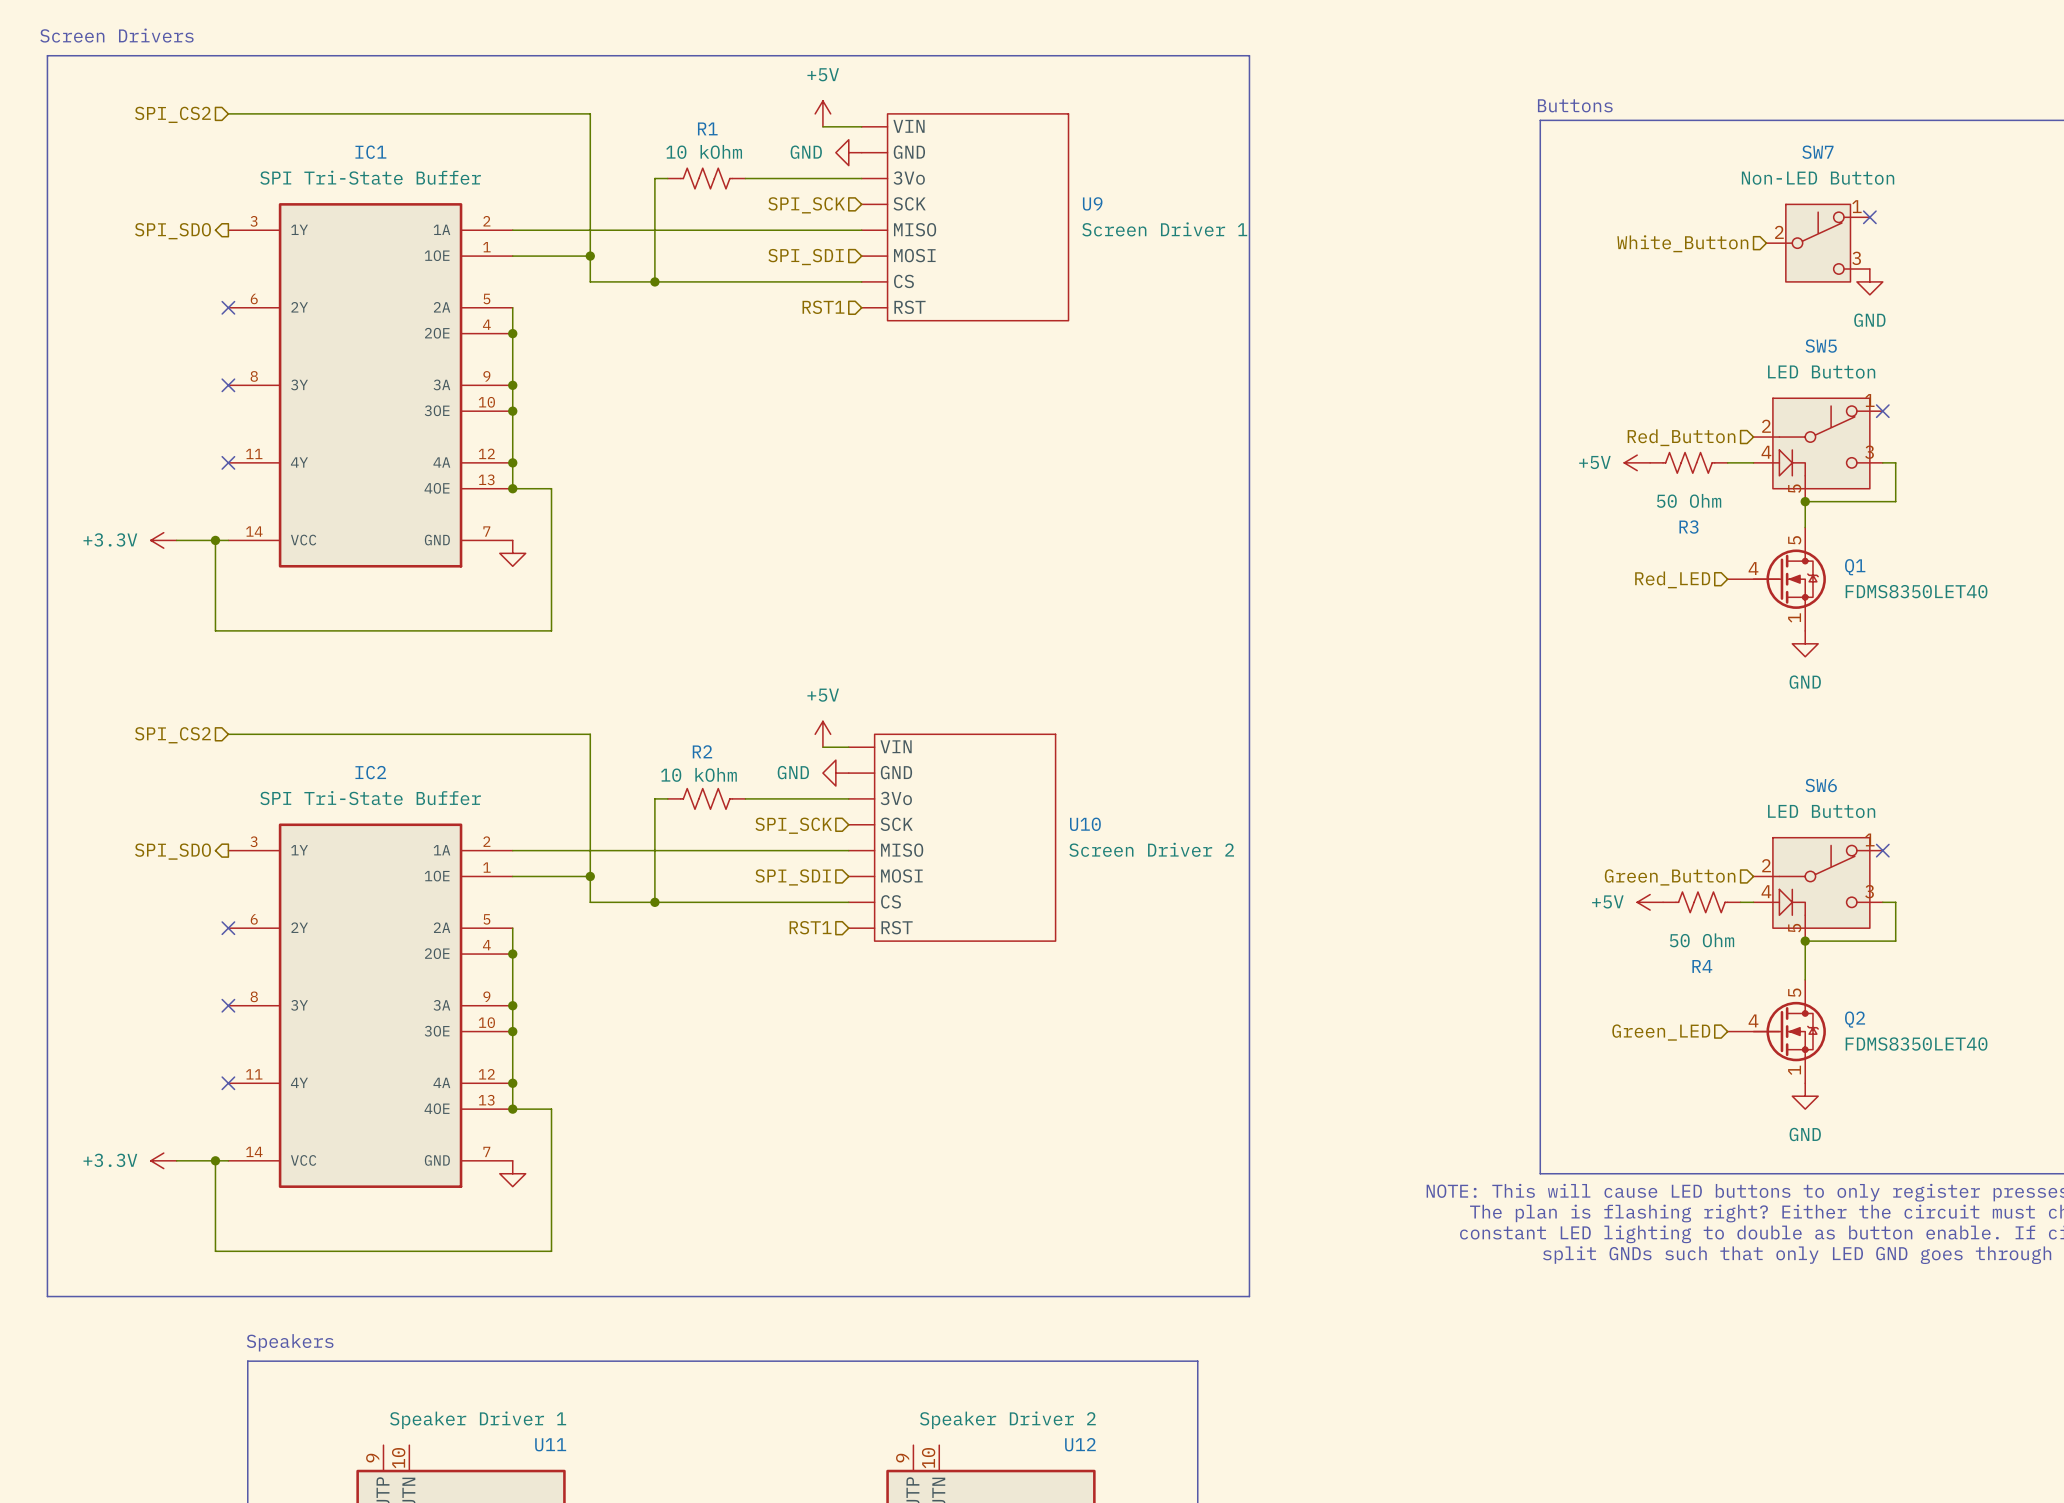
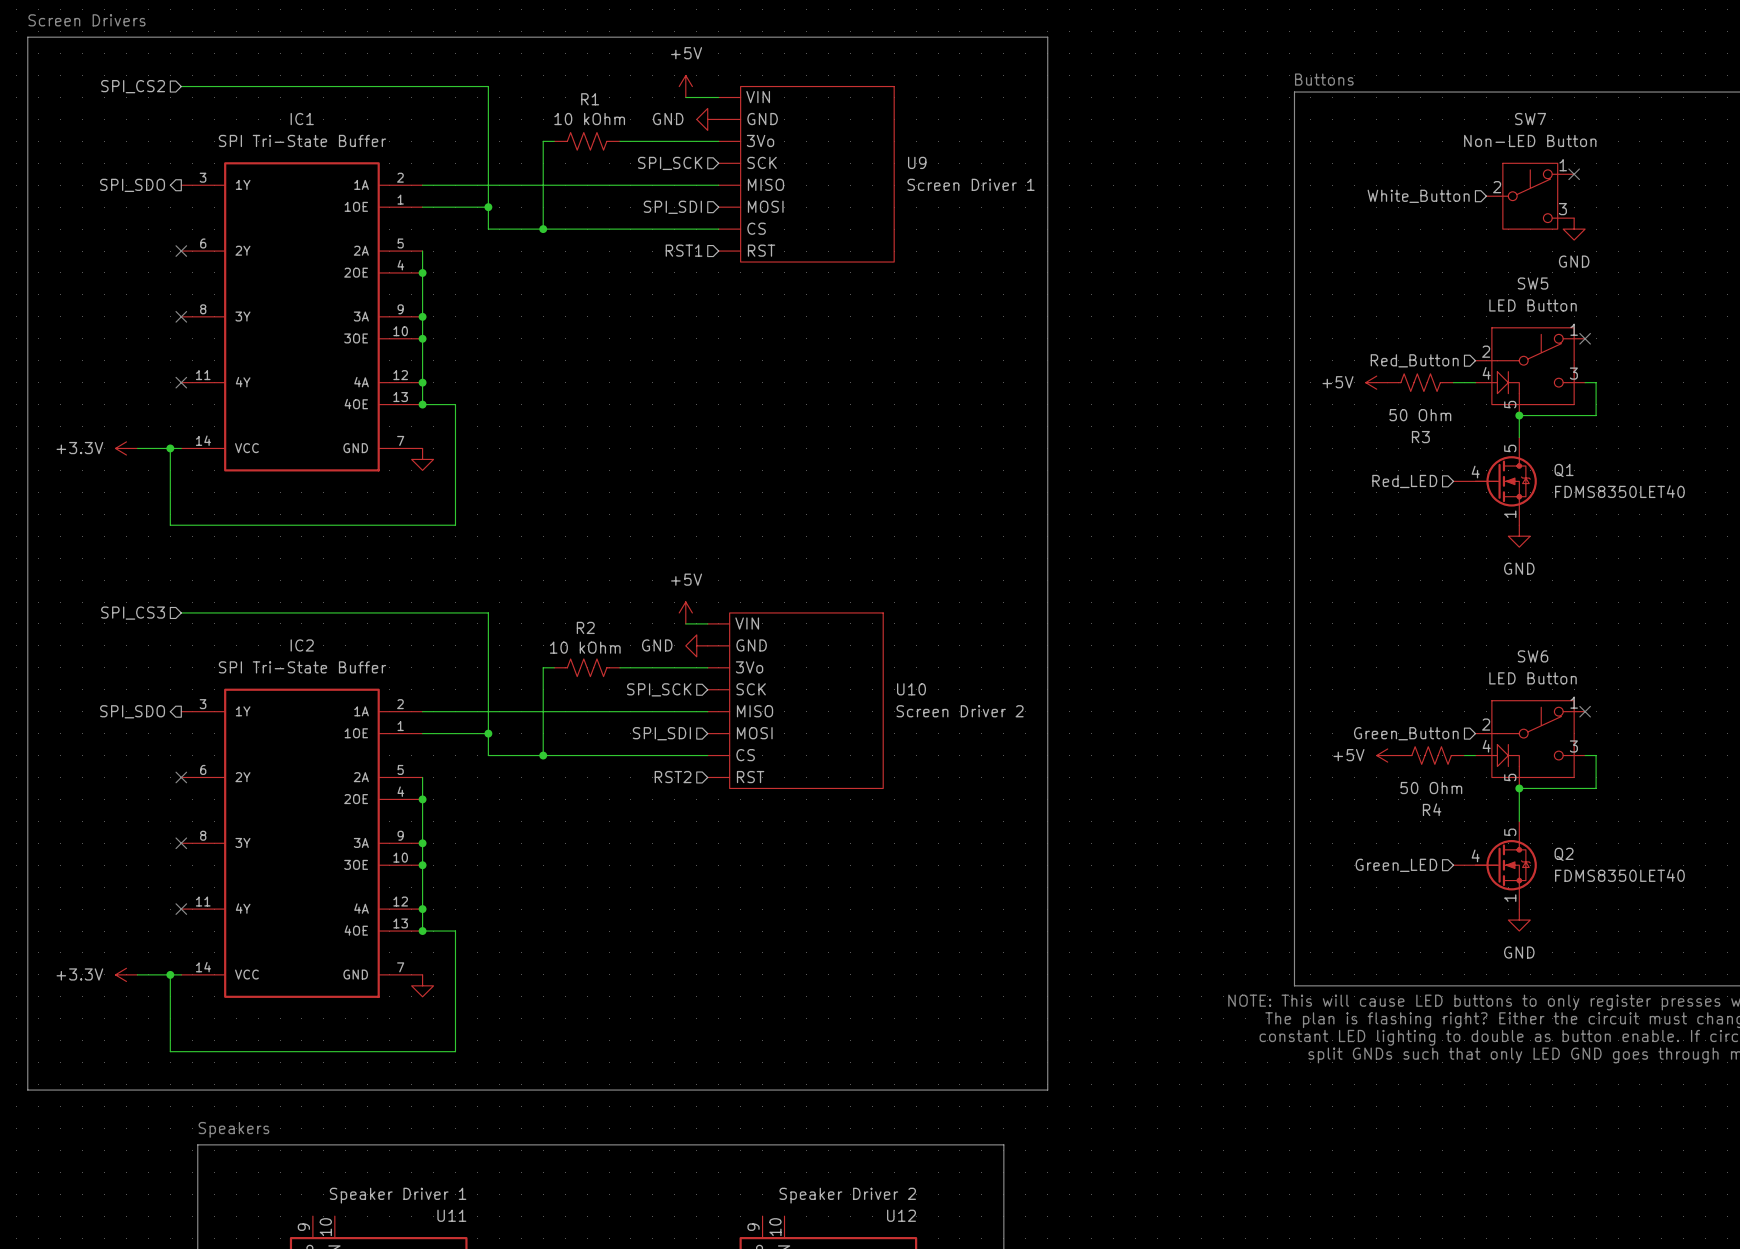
hierarchical label: SPI_CS2 (172, 735) -> SPI_CS3 (133, 613)
hierarchical label: RST1 (810, 927) -> RST2 (673, 777)

